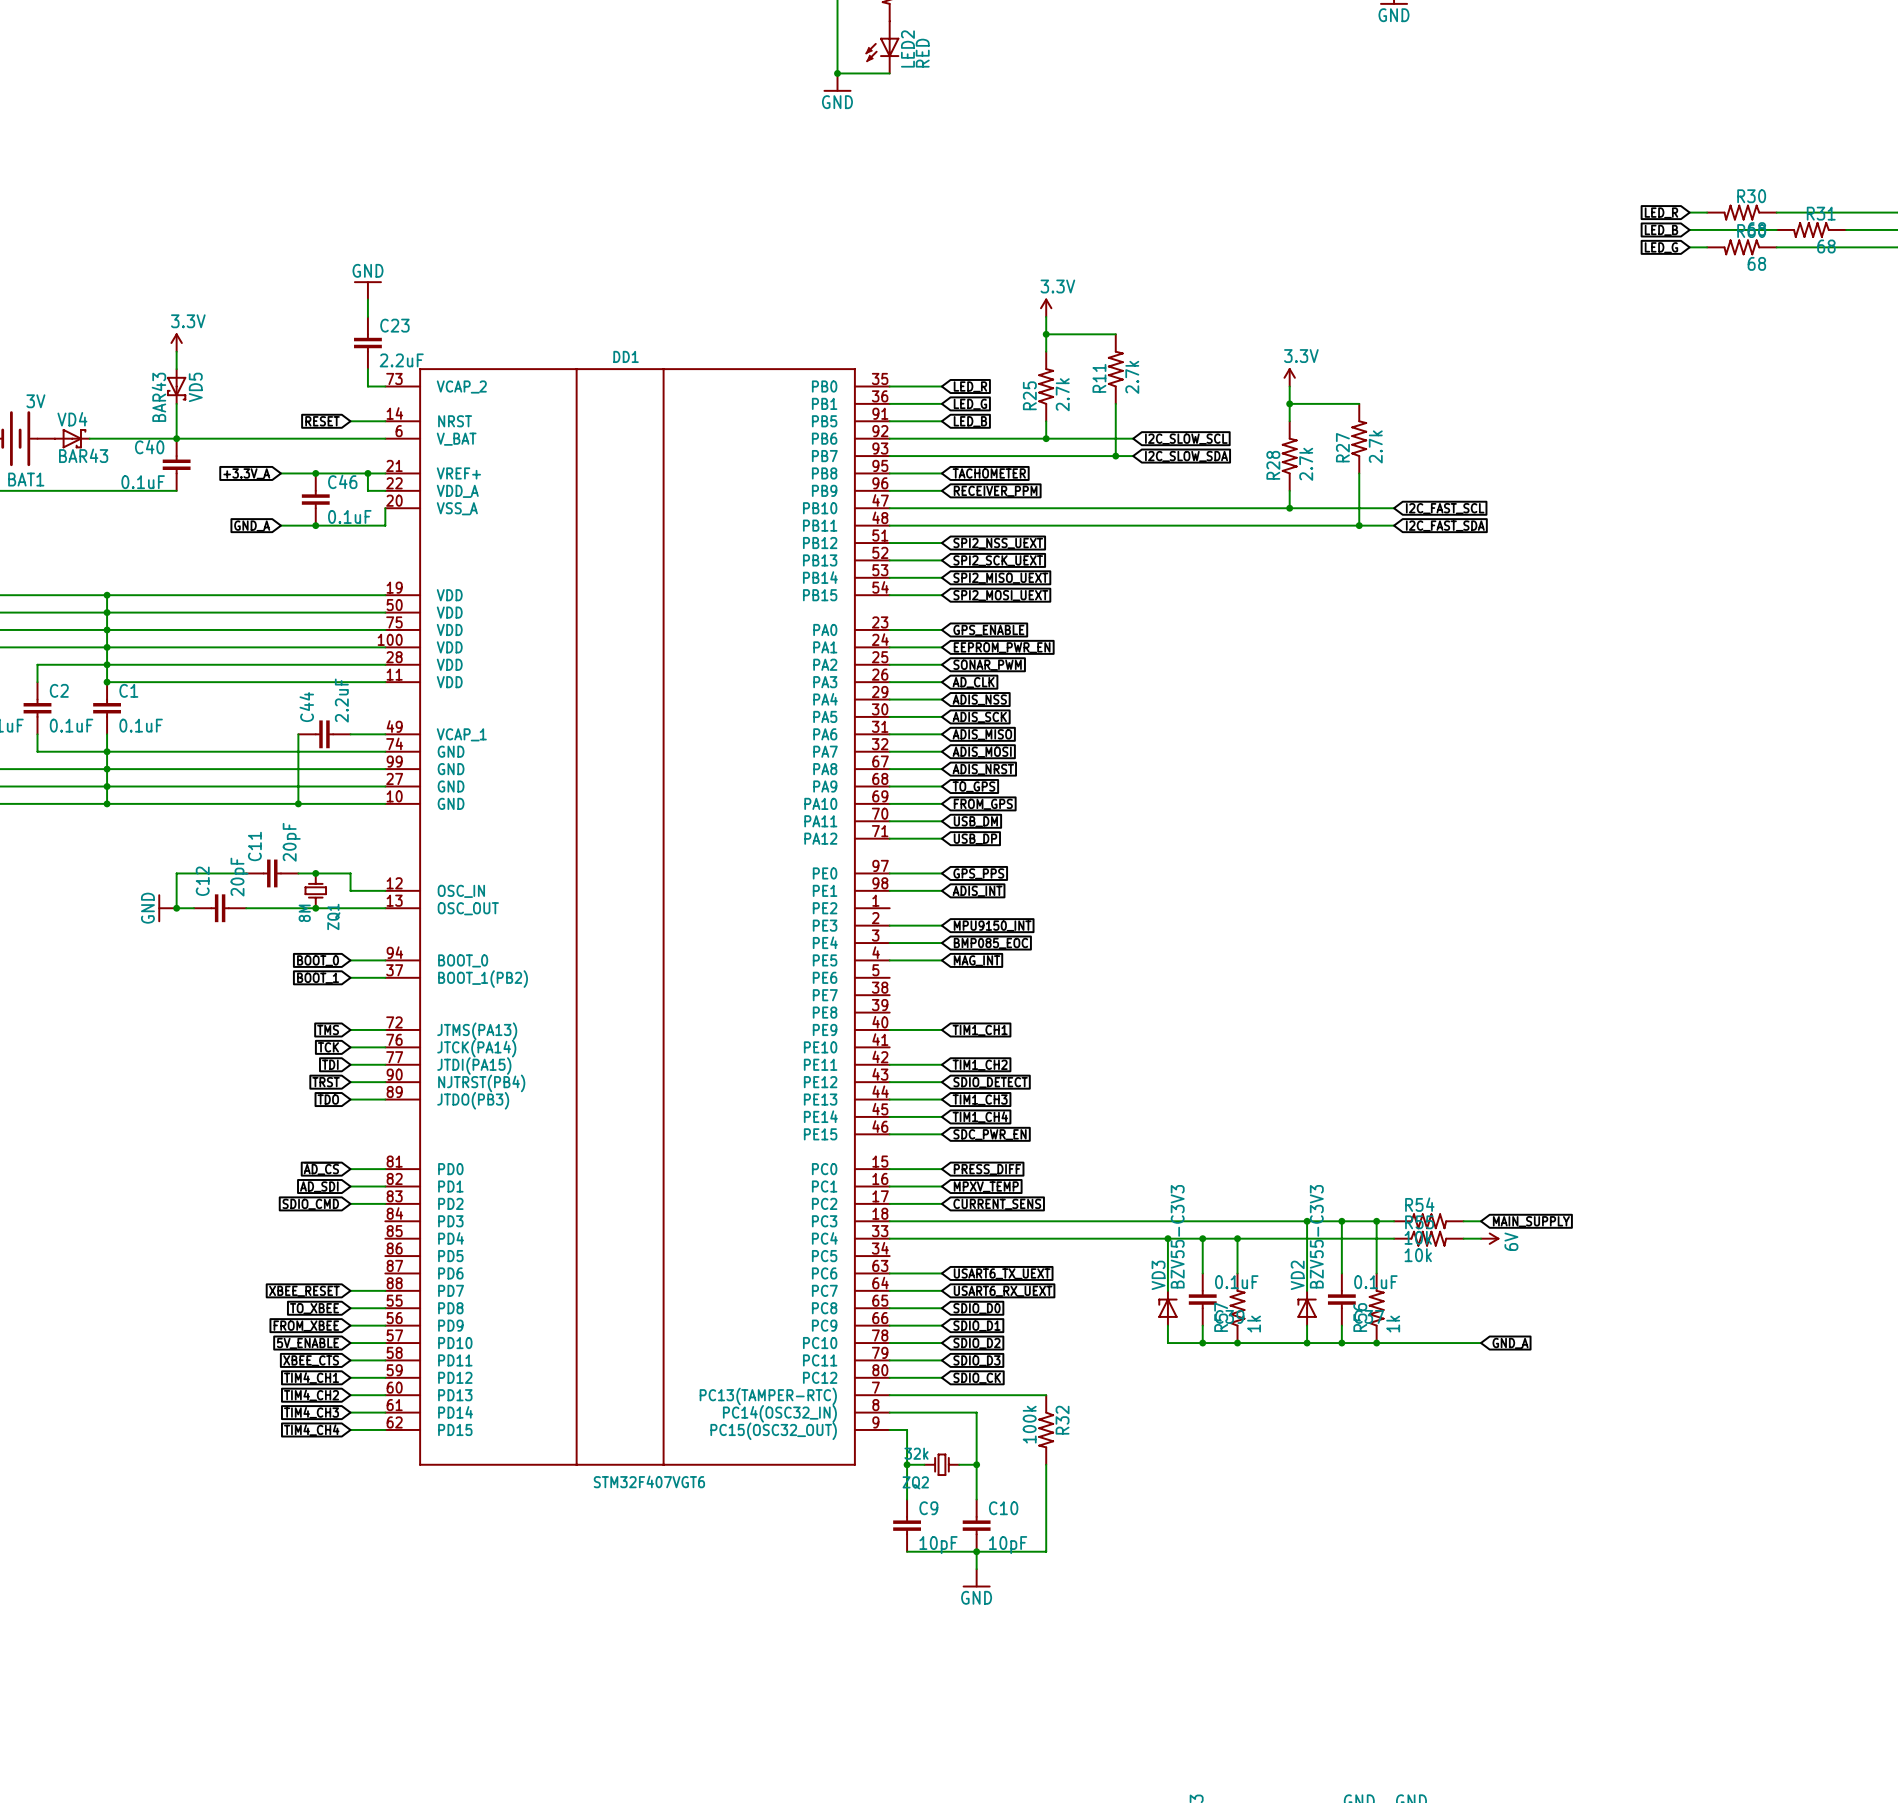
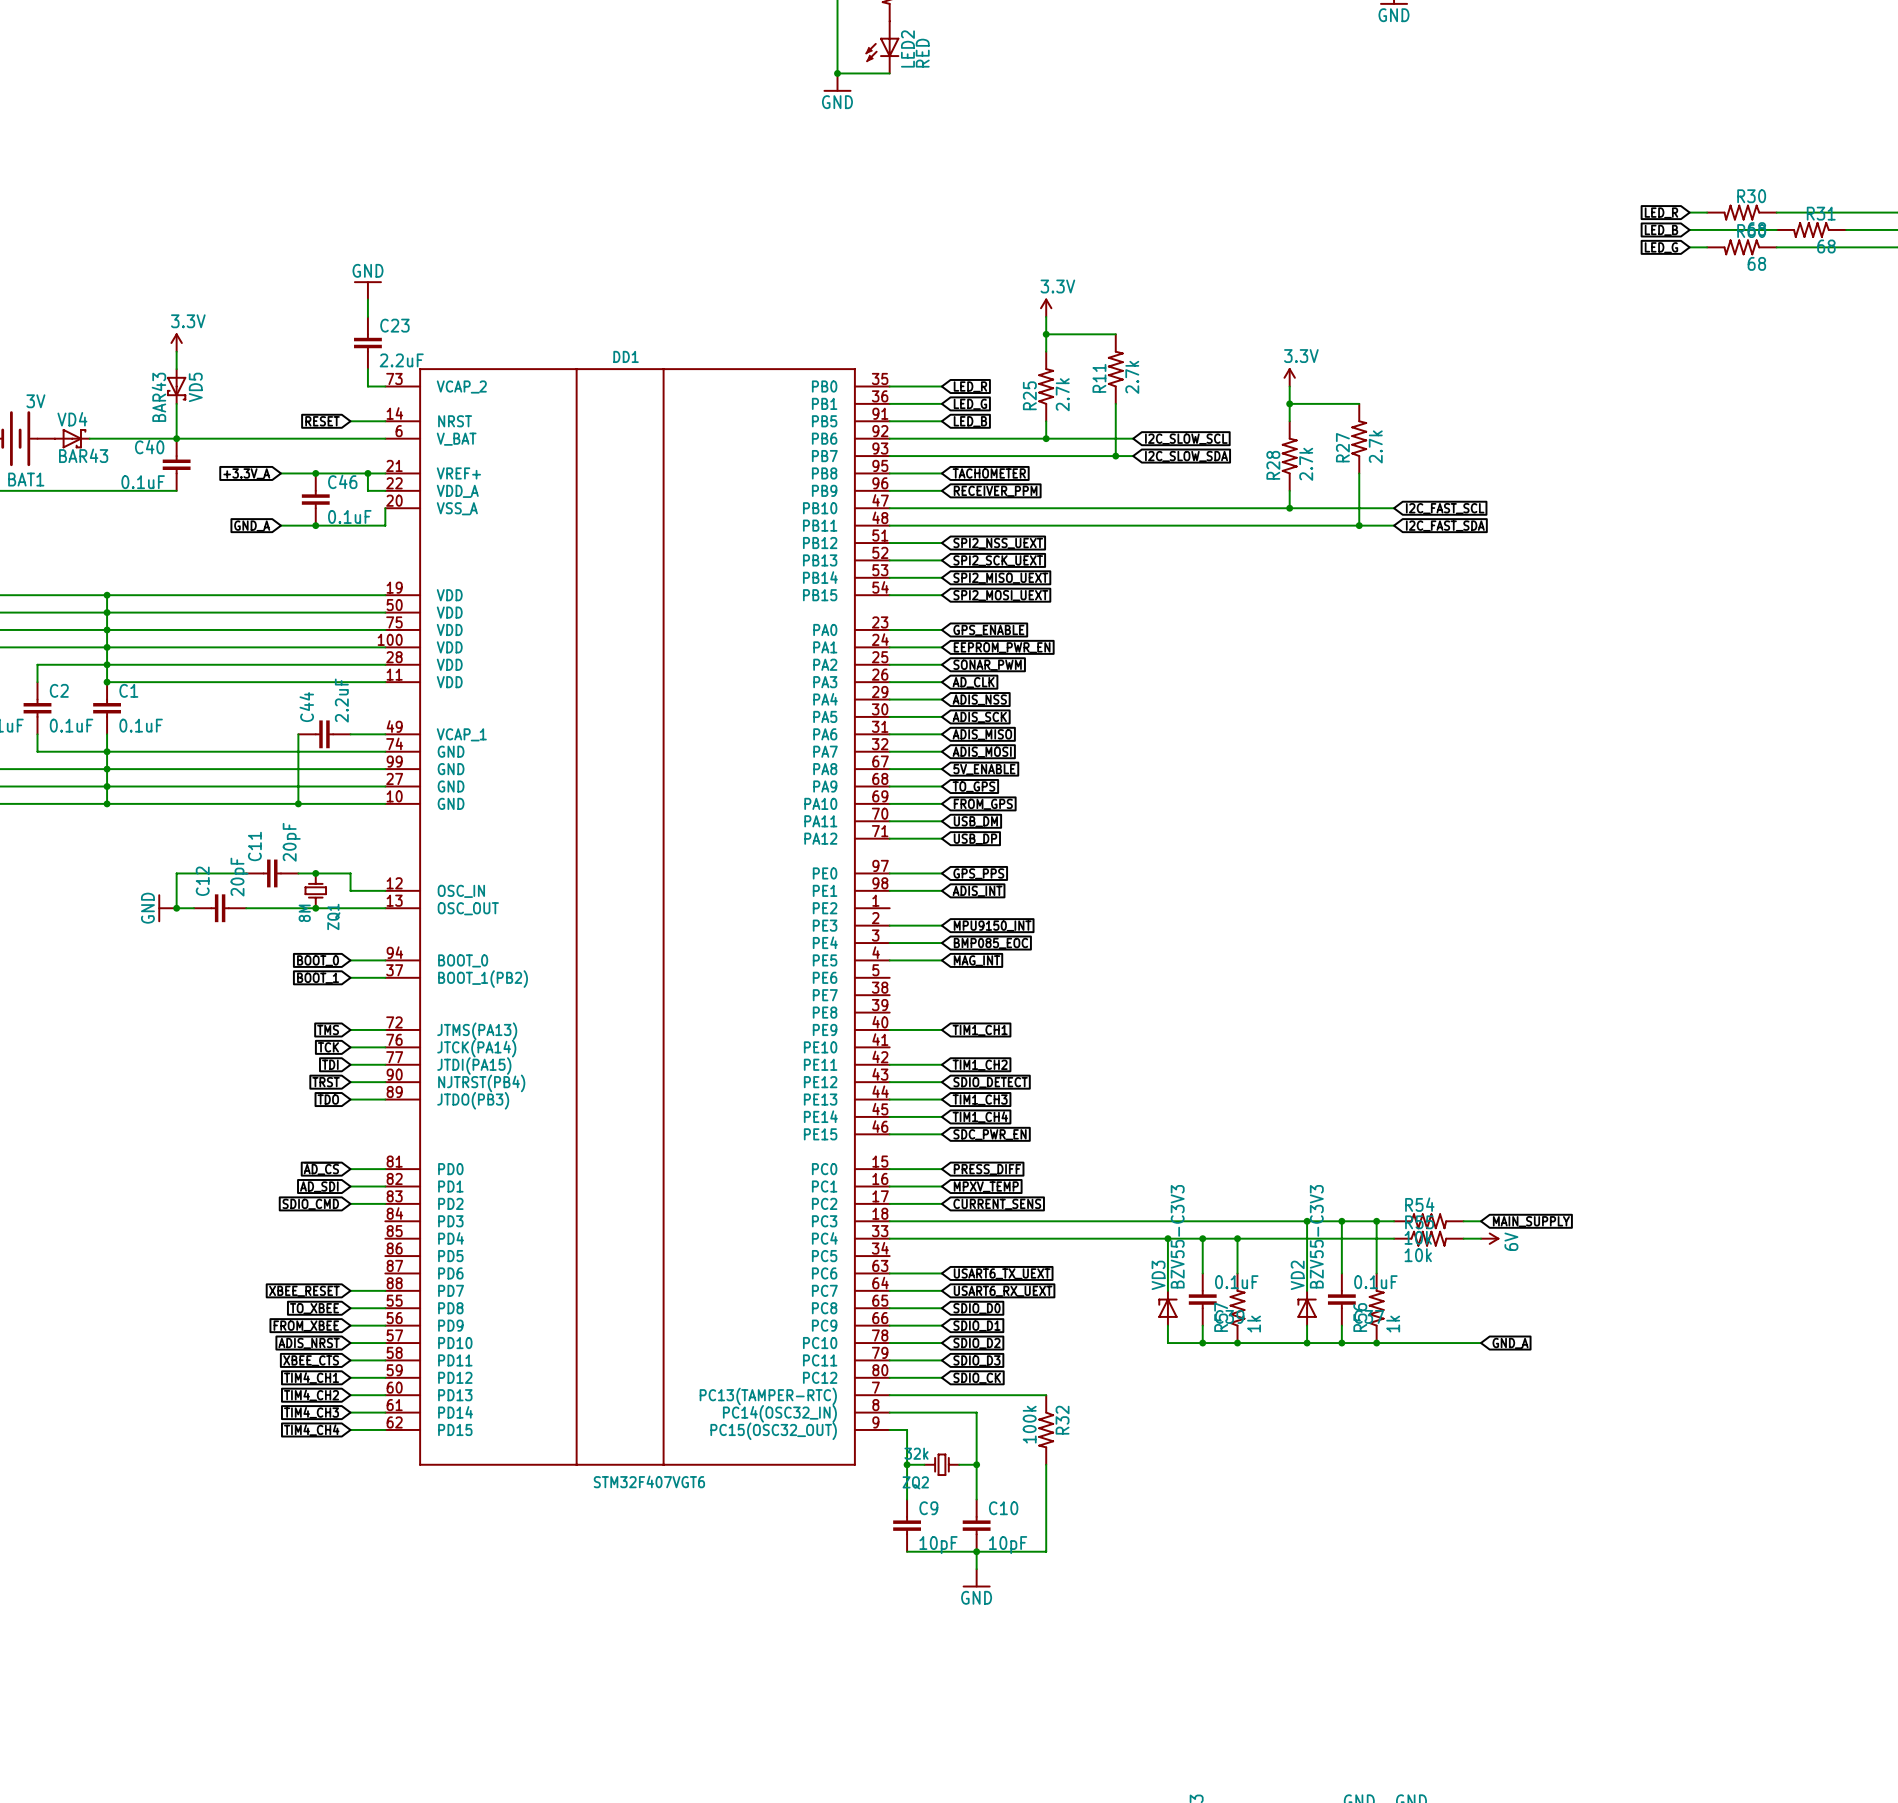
global label: ADIS_NRST (983, 769) -> 5V_ENABLE (984, 769)
global label: 5V_ENABLE (307, 1343) -> ADIS_NRST (309, 1343)

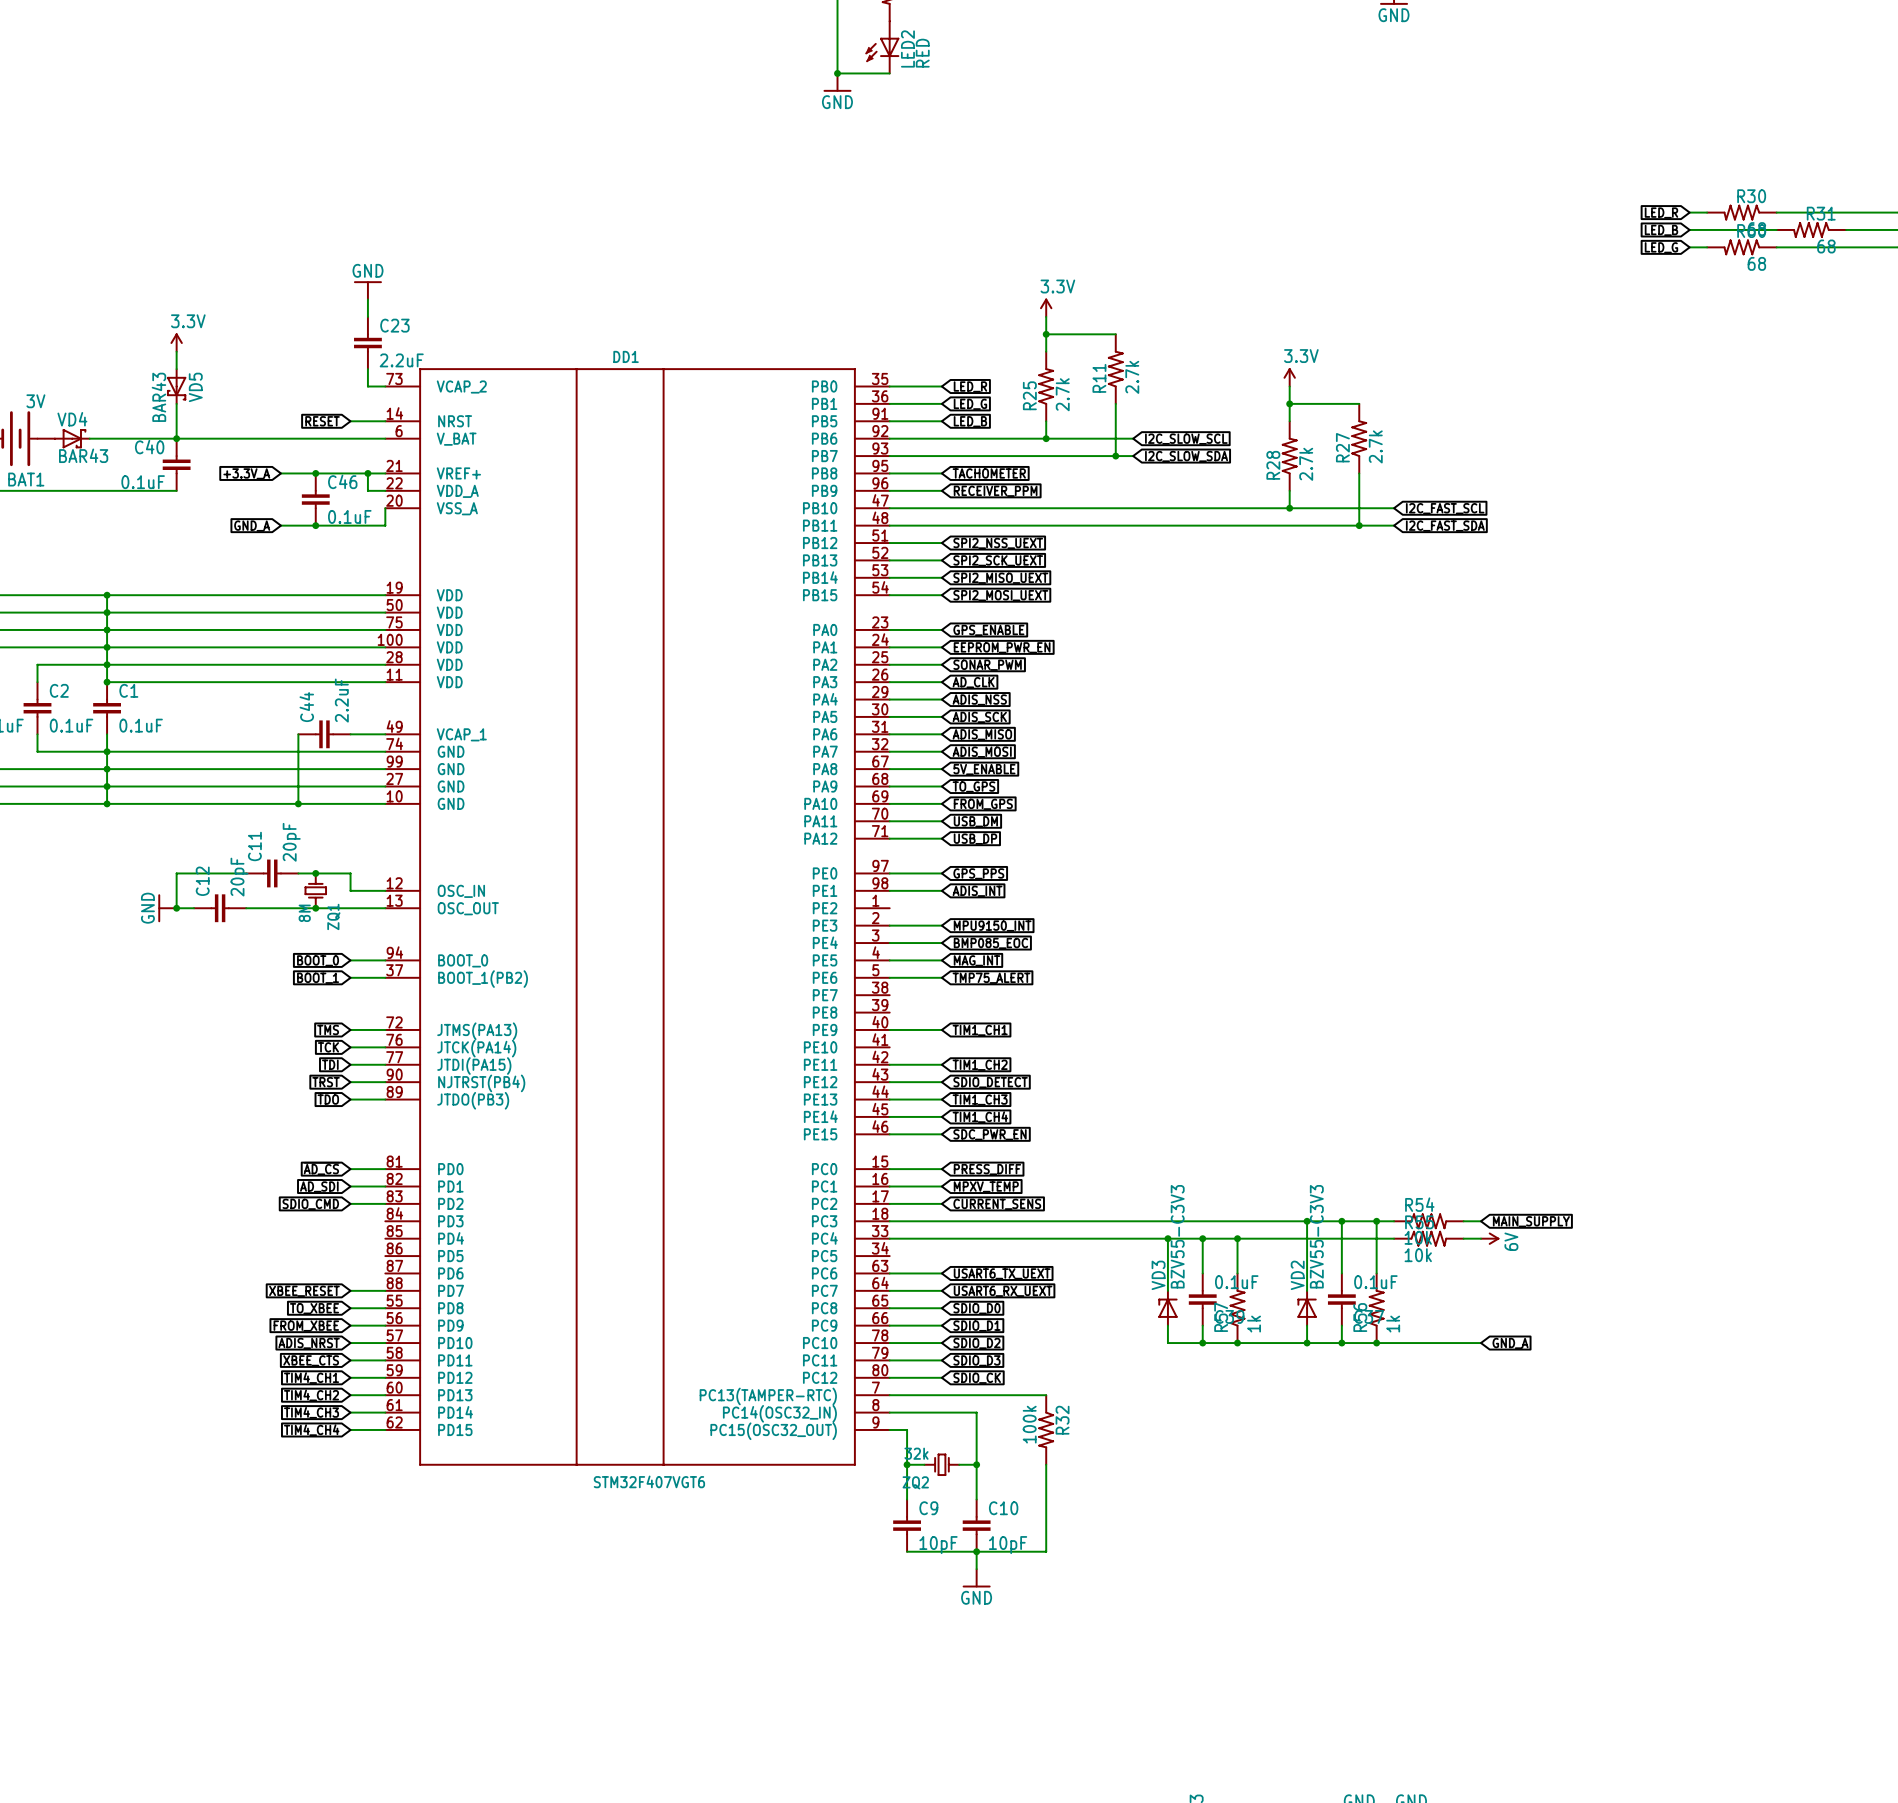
wire: none -> (889, 977) (941, 977)
global label: none -> TMP75_ALERT (991, 978)

